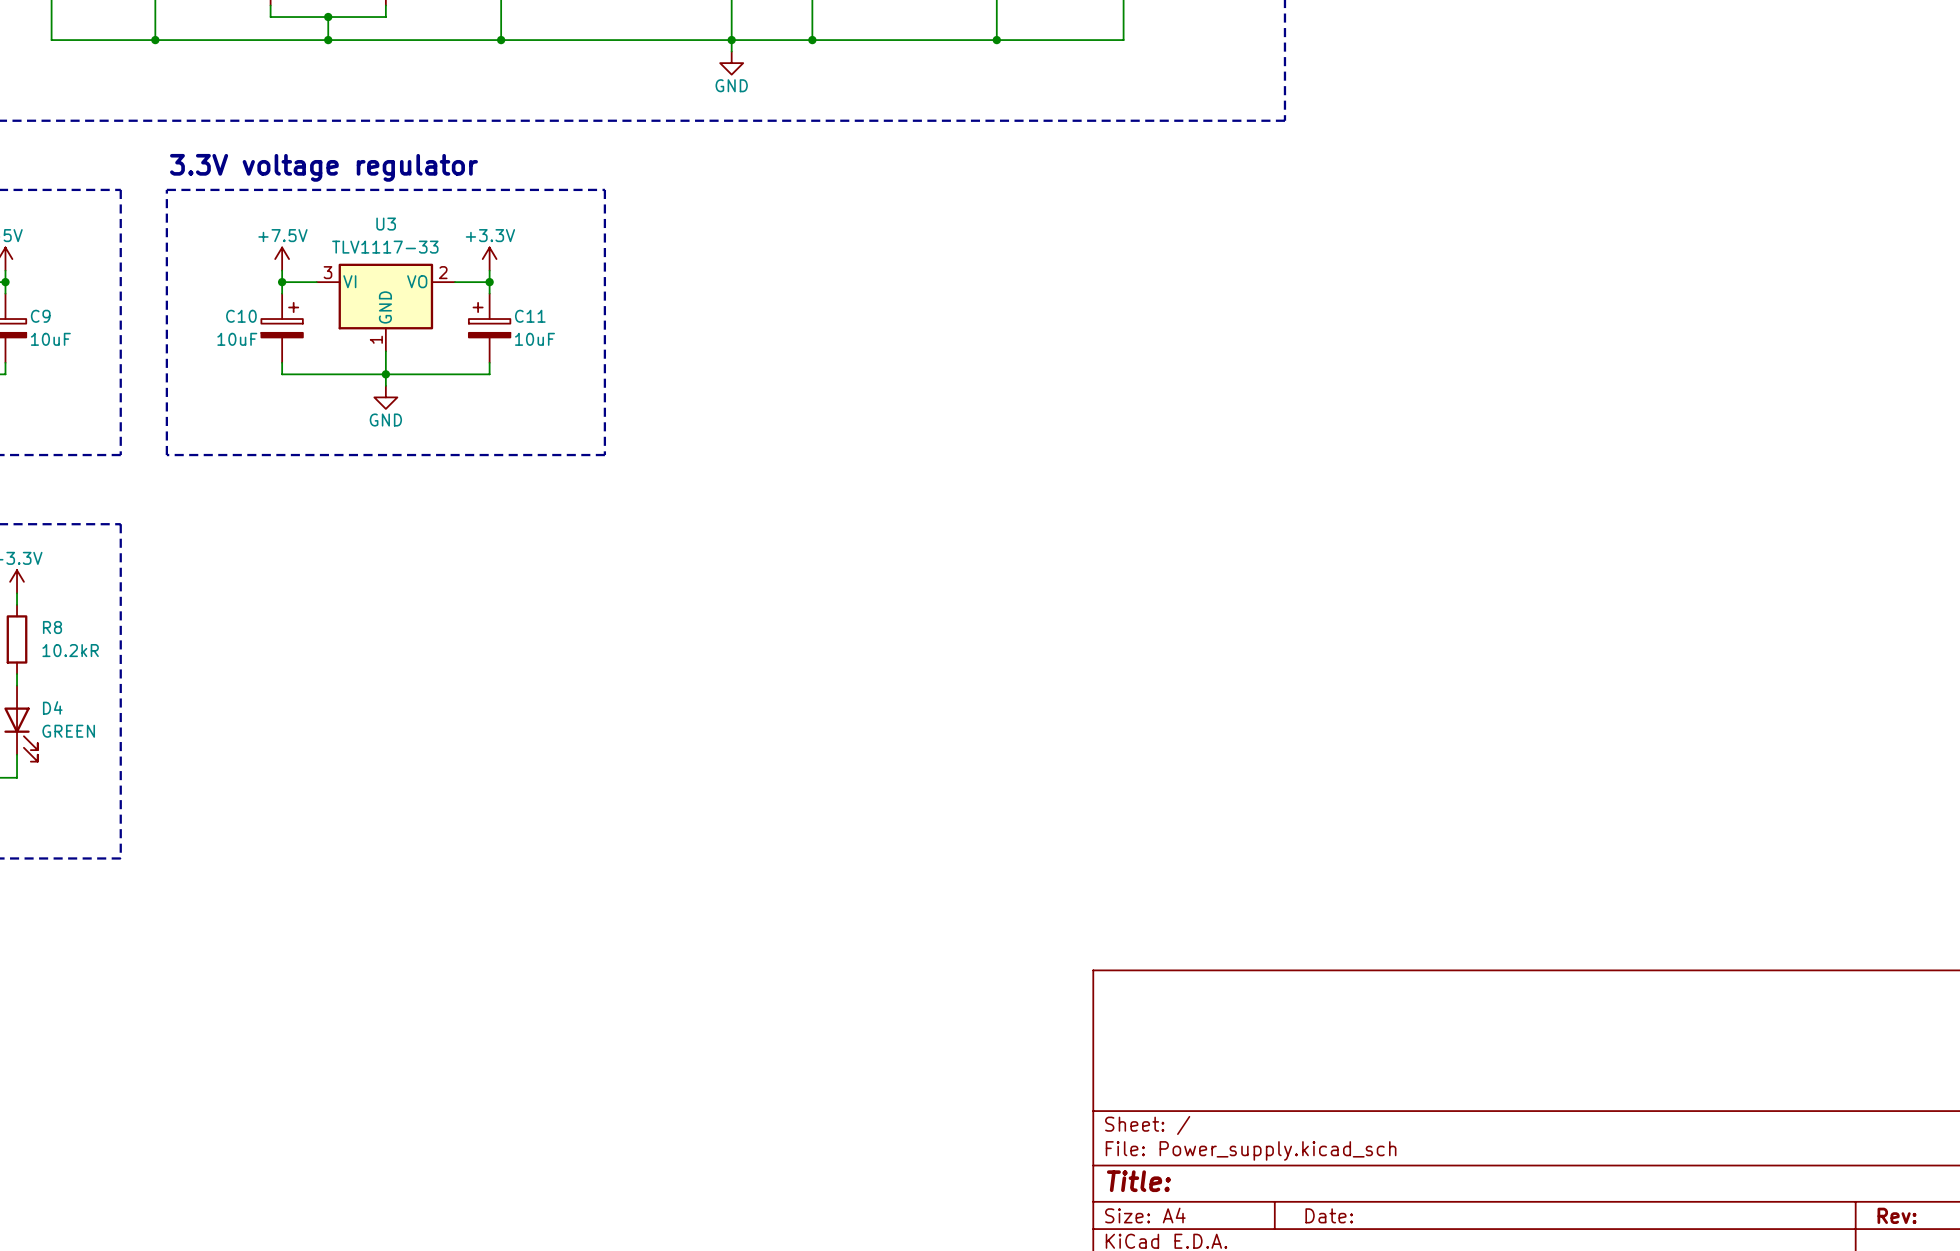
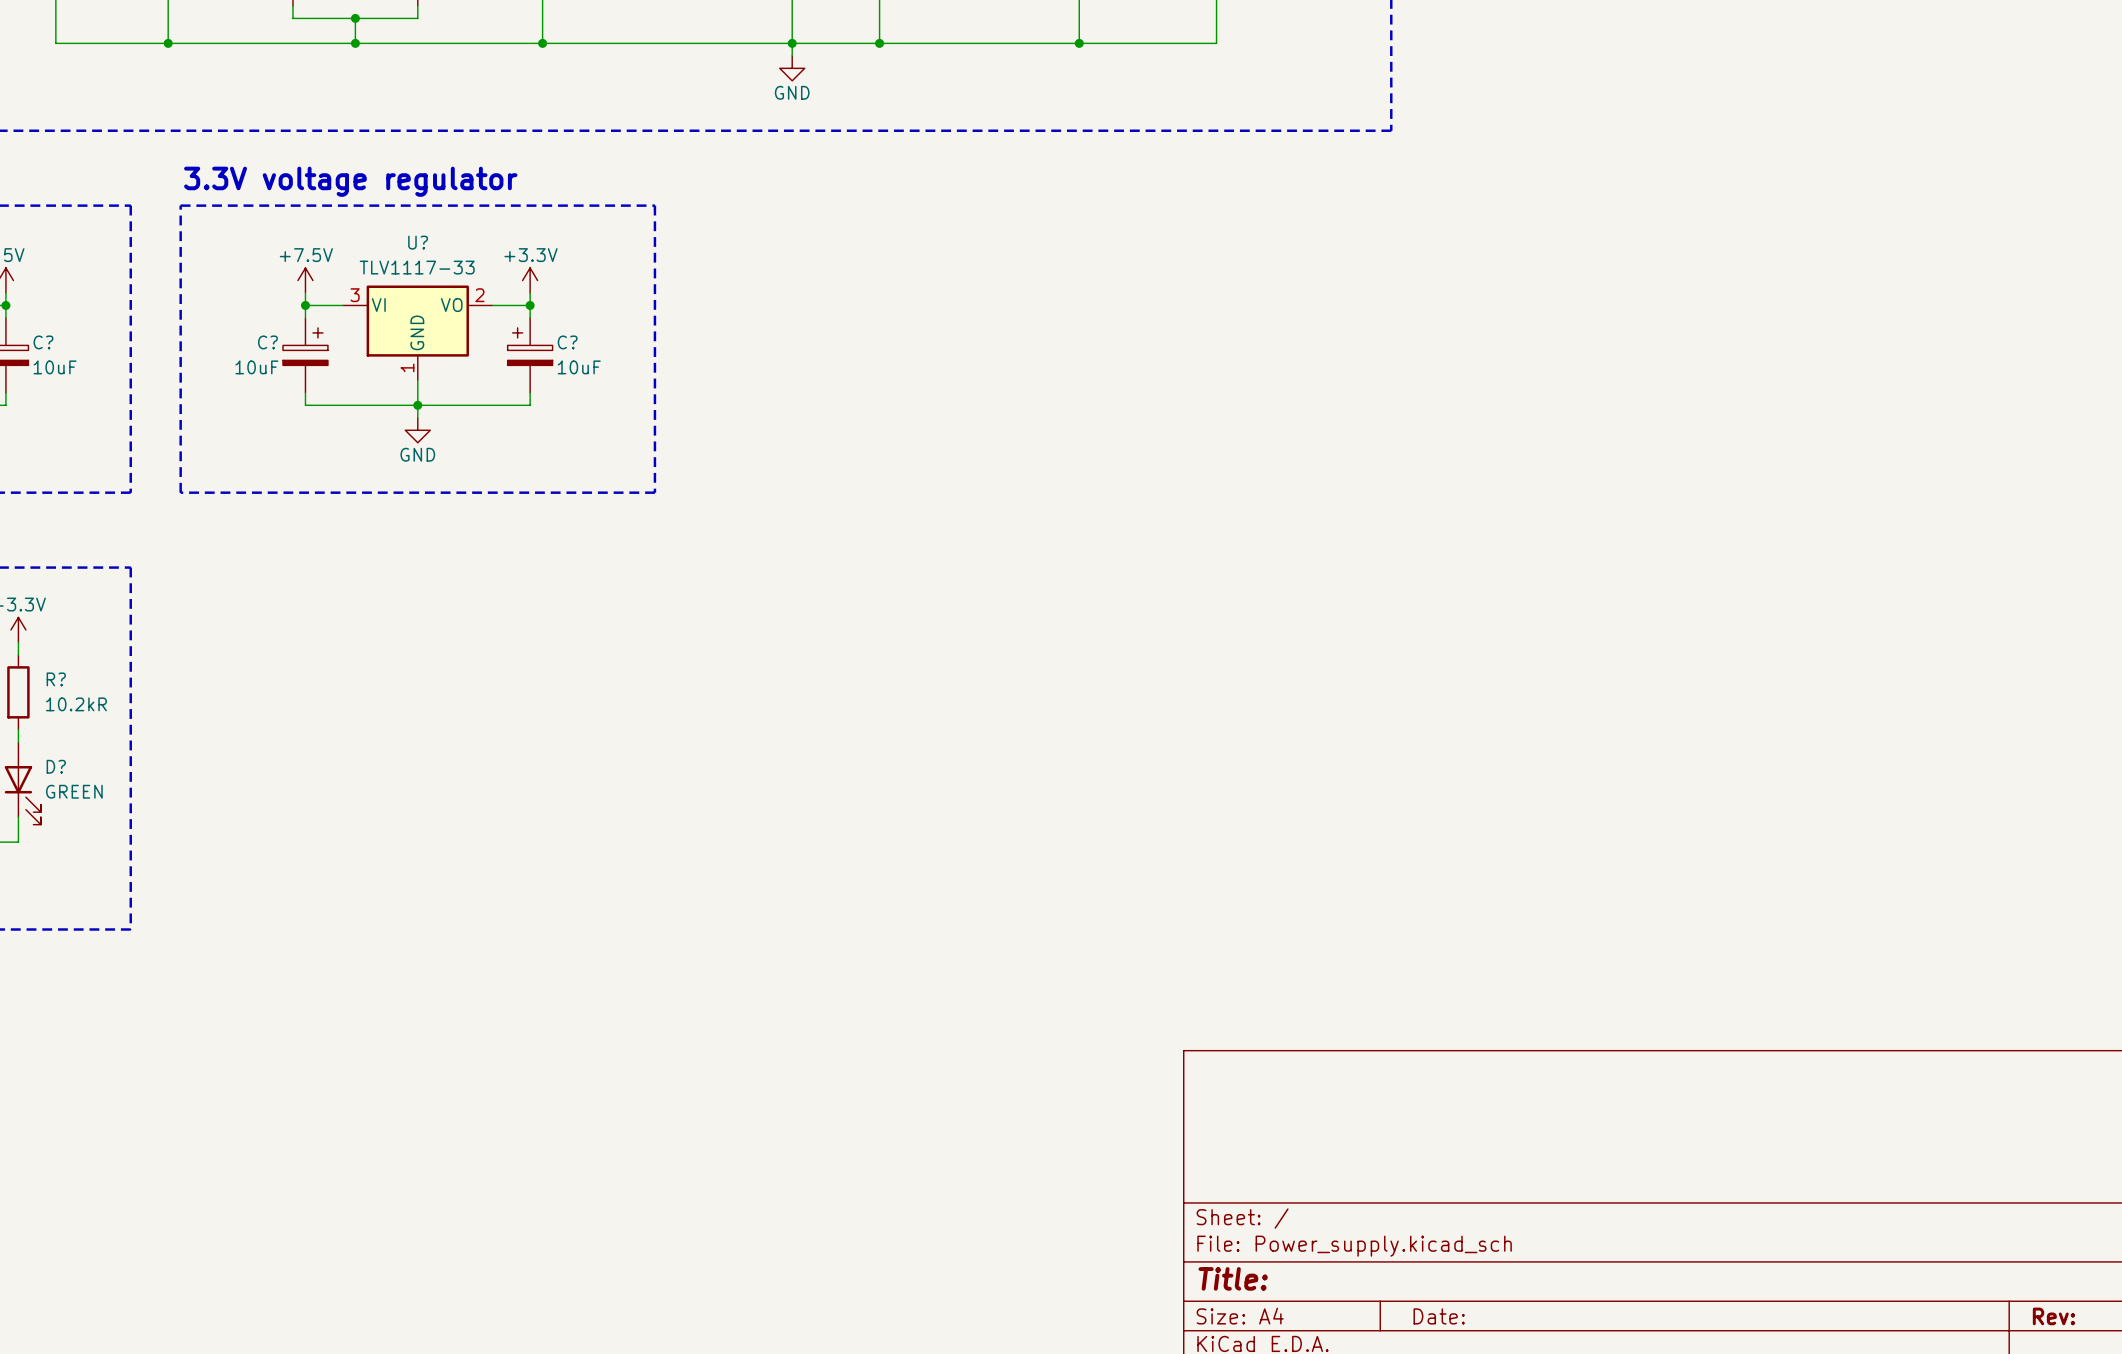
U3 name: U3 (386, 224) -> U? (418, 242)
C9 name: C9 (40, 316) -> C? (43, 342)
C10 name: C10 (241, 316) -> C? (267, 342)
C11 name: C11 (530, 316) -> C? (567, 342)
R8 name: R8 (52, 627) -> R? (56, 679)
D4 name: D4 (52, 707) -> D? (56, 766)

